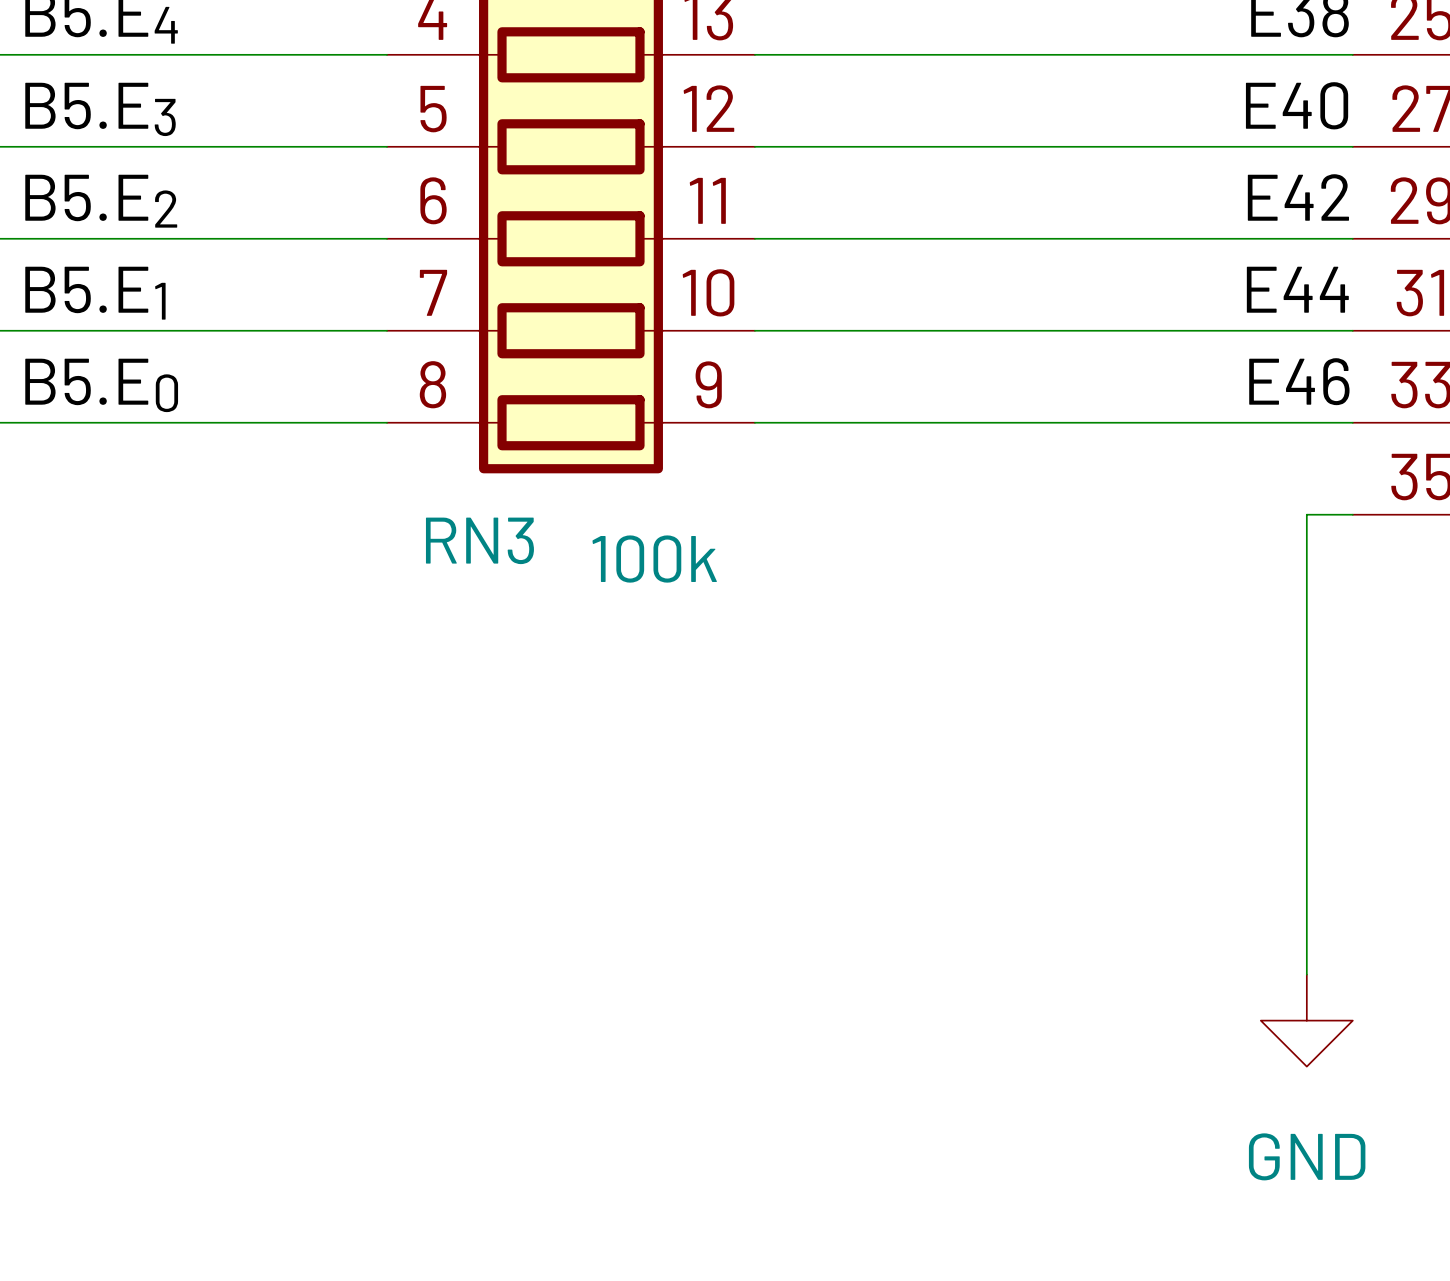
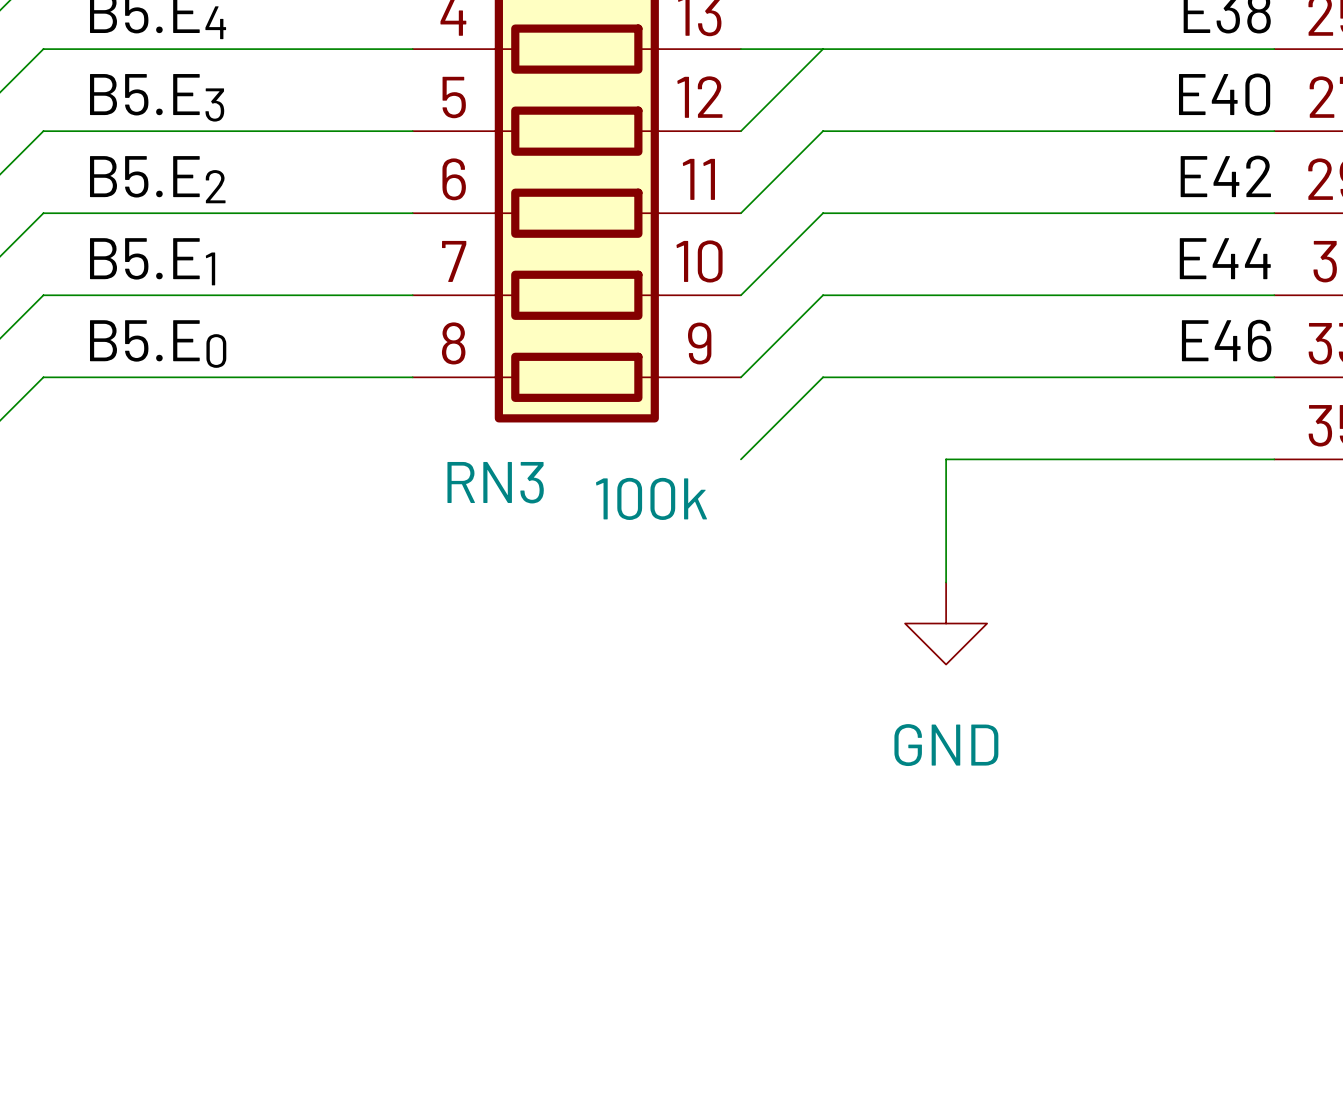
wire: (754, 146) (846, 146) -> (740, 131) (823, 49)
wire: (754, 238) (846, 238) -> (740, 213) (823, 131)
wire: (754, 330) (846, 330) -> (740, 295) (823, 213)
wire: (754, 422) (846, 422) -> (740, 377) (823, 295)
wire: none -> (823, 377) (740, 459)
wire: (1306, 514) (1306, 974) -> (1233, 459) (946, 459) (946, 582)
power symbol position: GND (1306, 1020) -> GND (946, 623)

